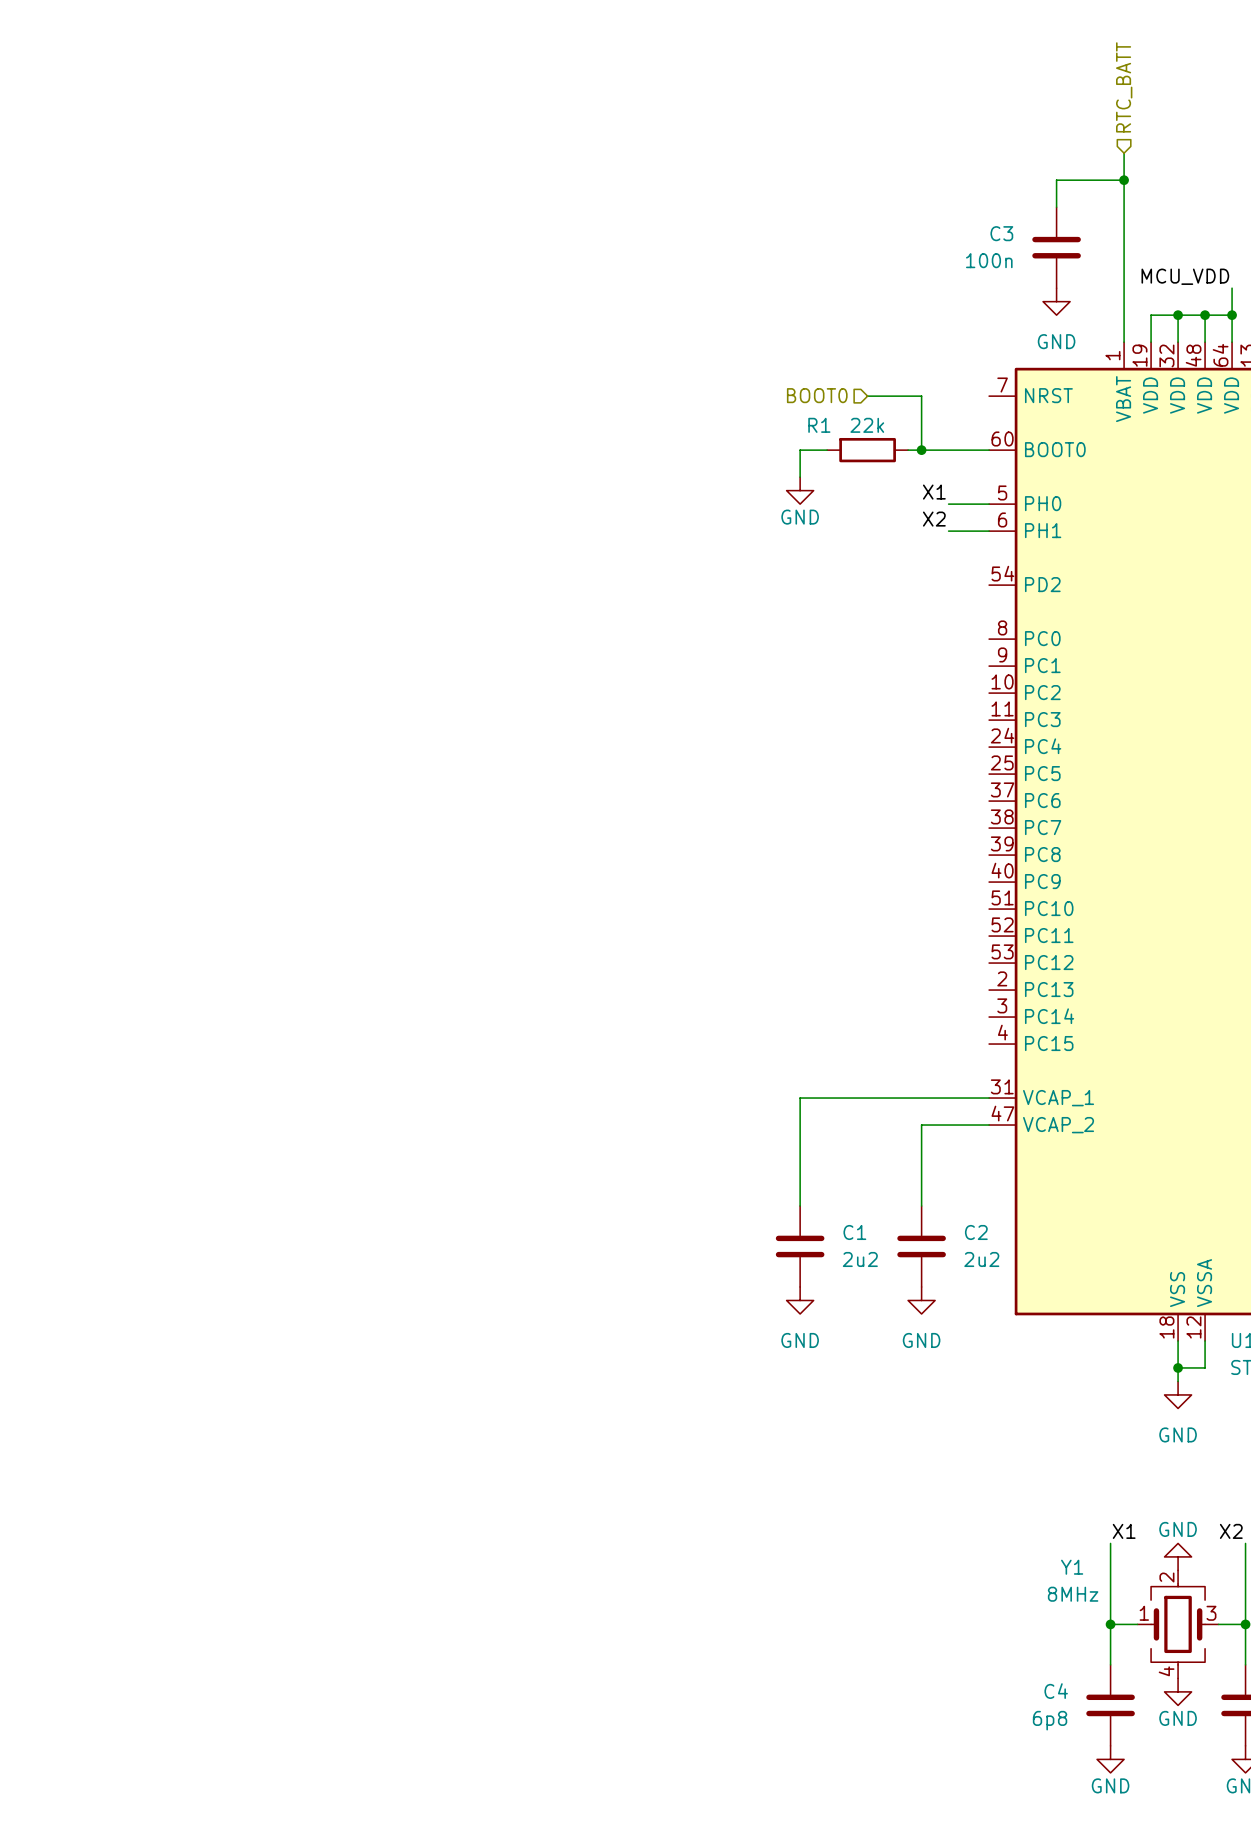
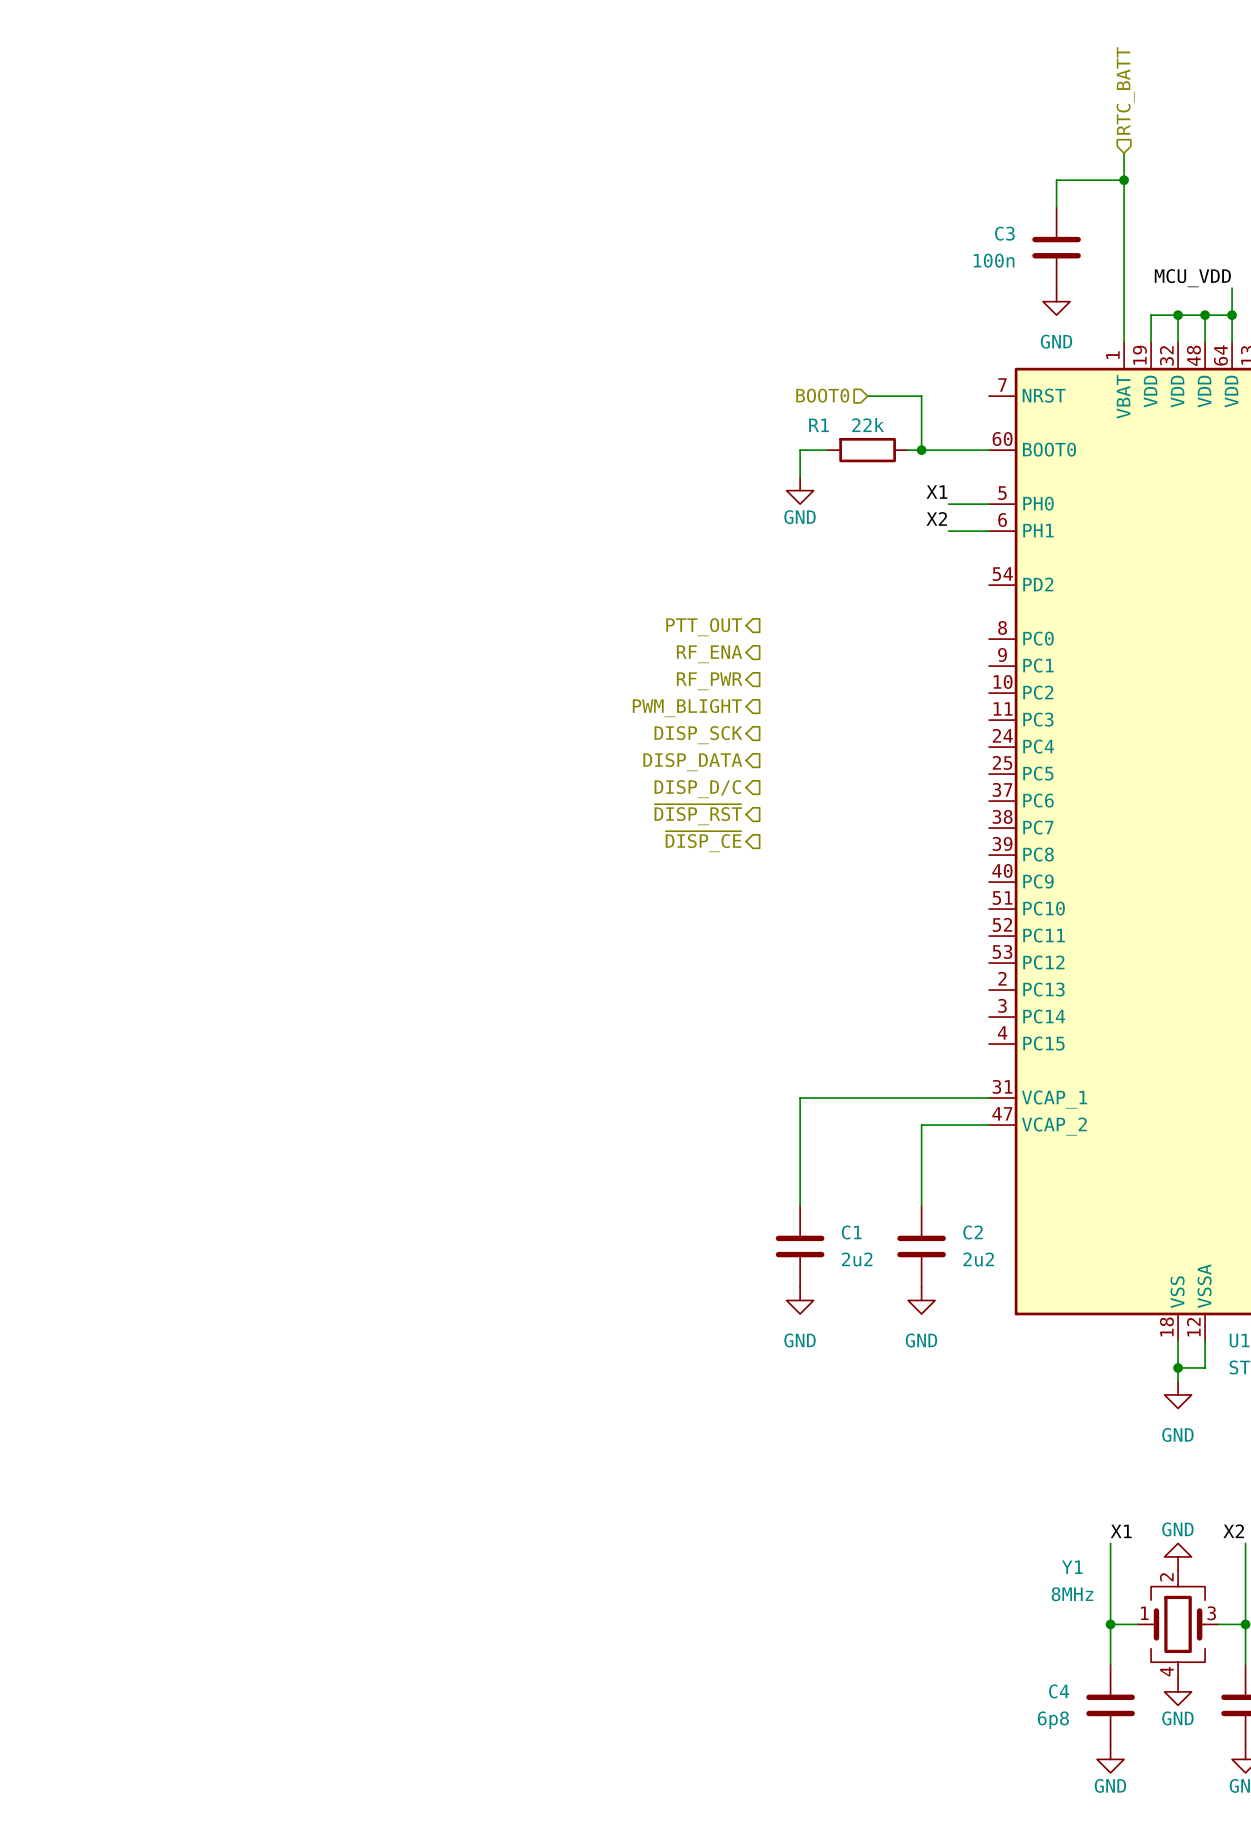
hierarchical label: none -> PTT_OUT (704, 627)
hierarchical label: none -> RF_ENA (709, 654)
hierarchical label: none -> RF_PWR (709, 681)
hierarchical label: none -> PWM_BLIGHT (687, 708)
hierarchical label: none -> DISP_SCK (698, 735)
hierarchical label: none -> DISP_DATA (692, 762)
hierarchical label: none -> DISP_D/C (697, 789)
hierarchical label: none -> ~{DISP_RST} (698, 814)
hierarchical label: none -> ~{DISP_CE} (703, 841)

